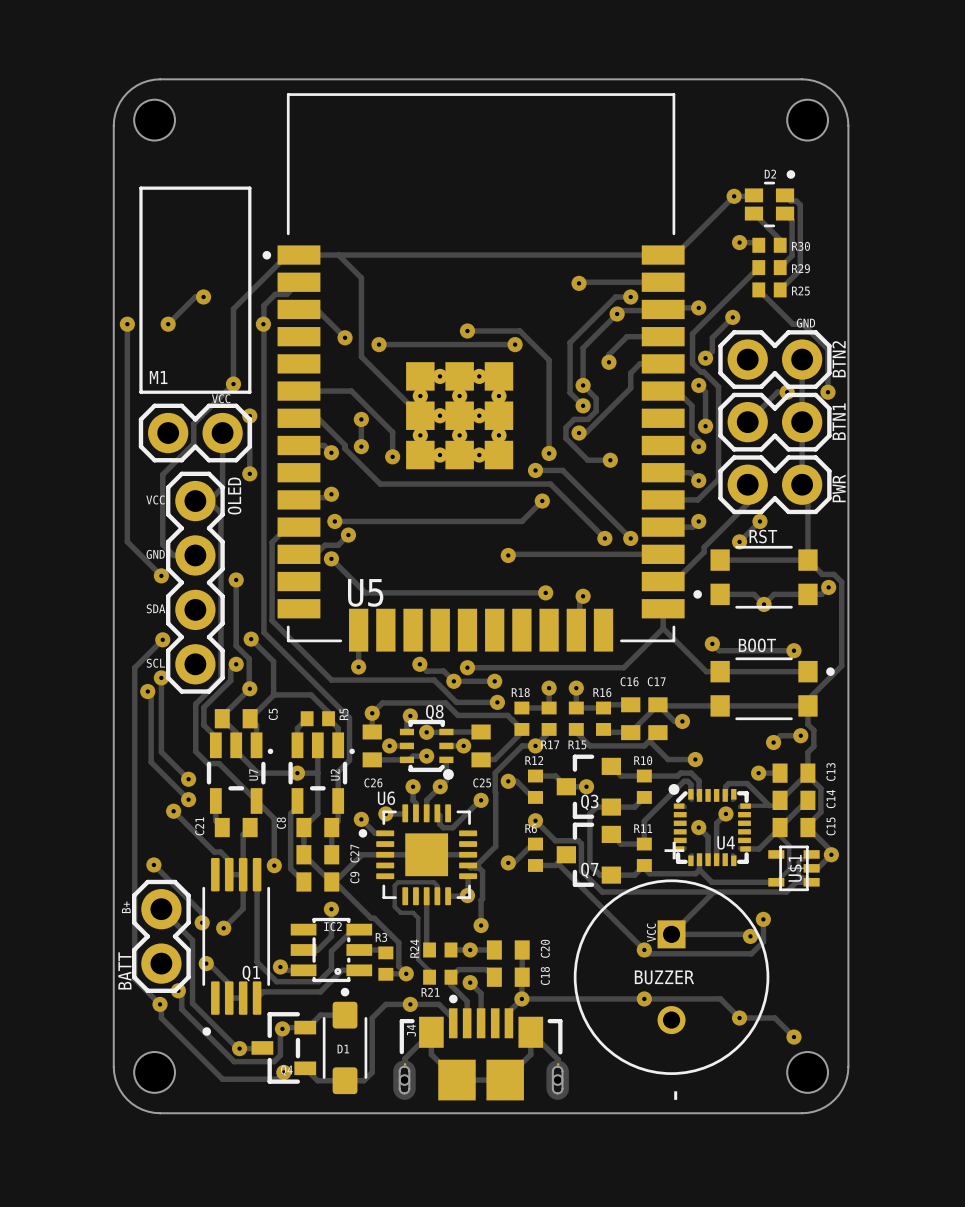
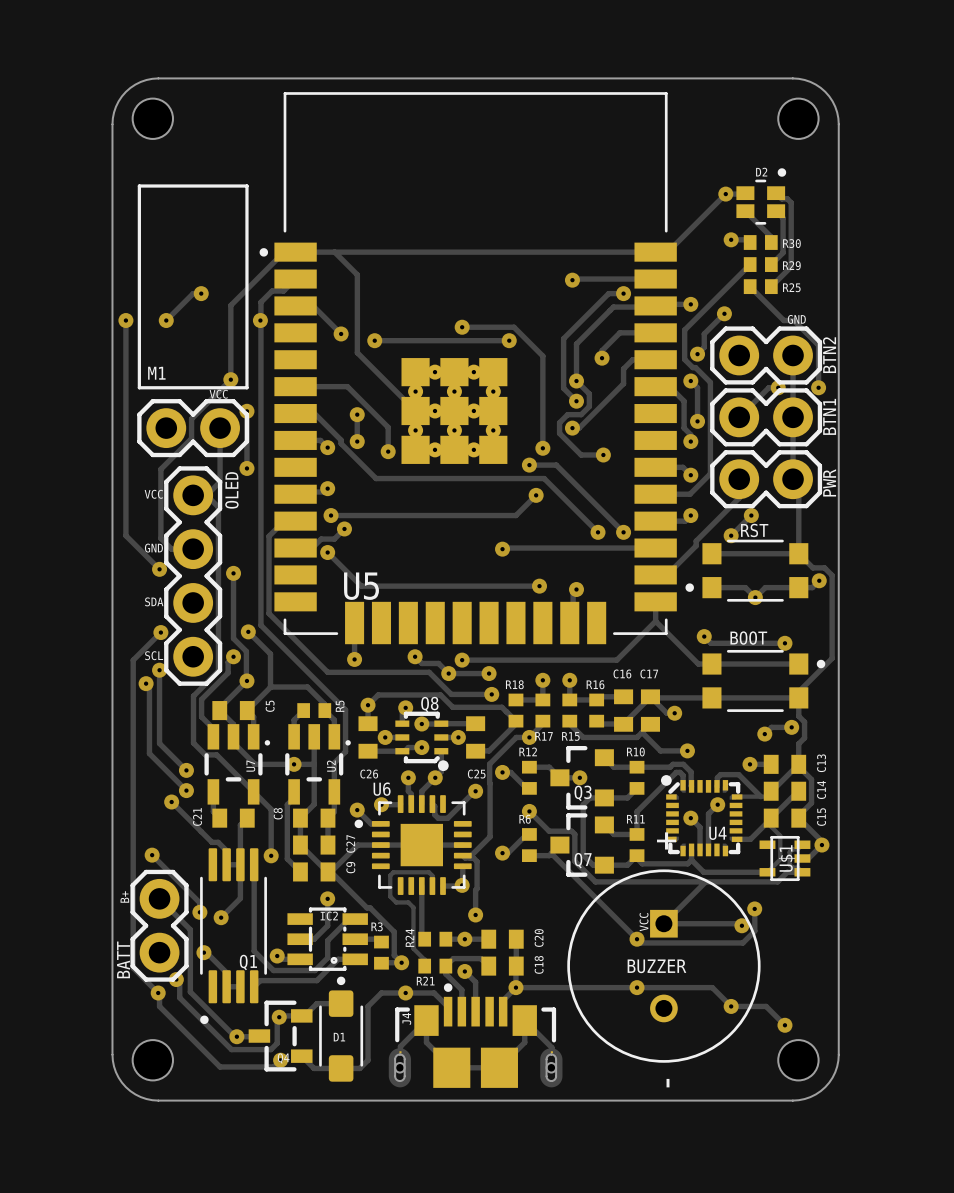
via: (617, 313) -> none

